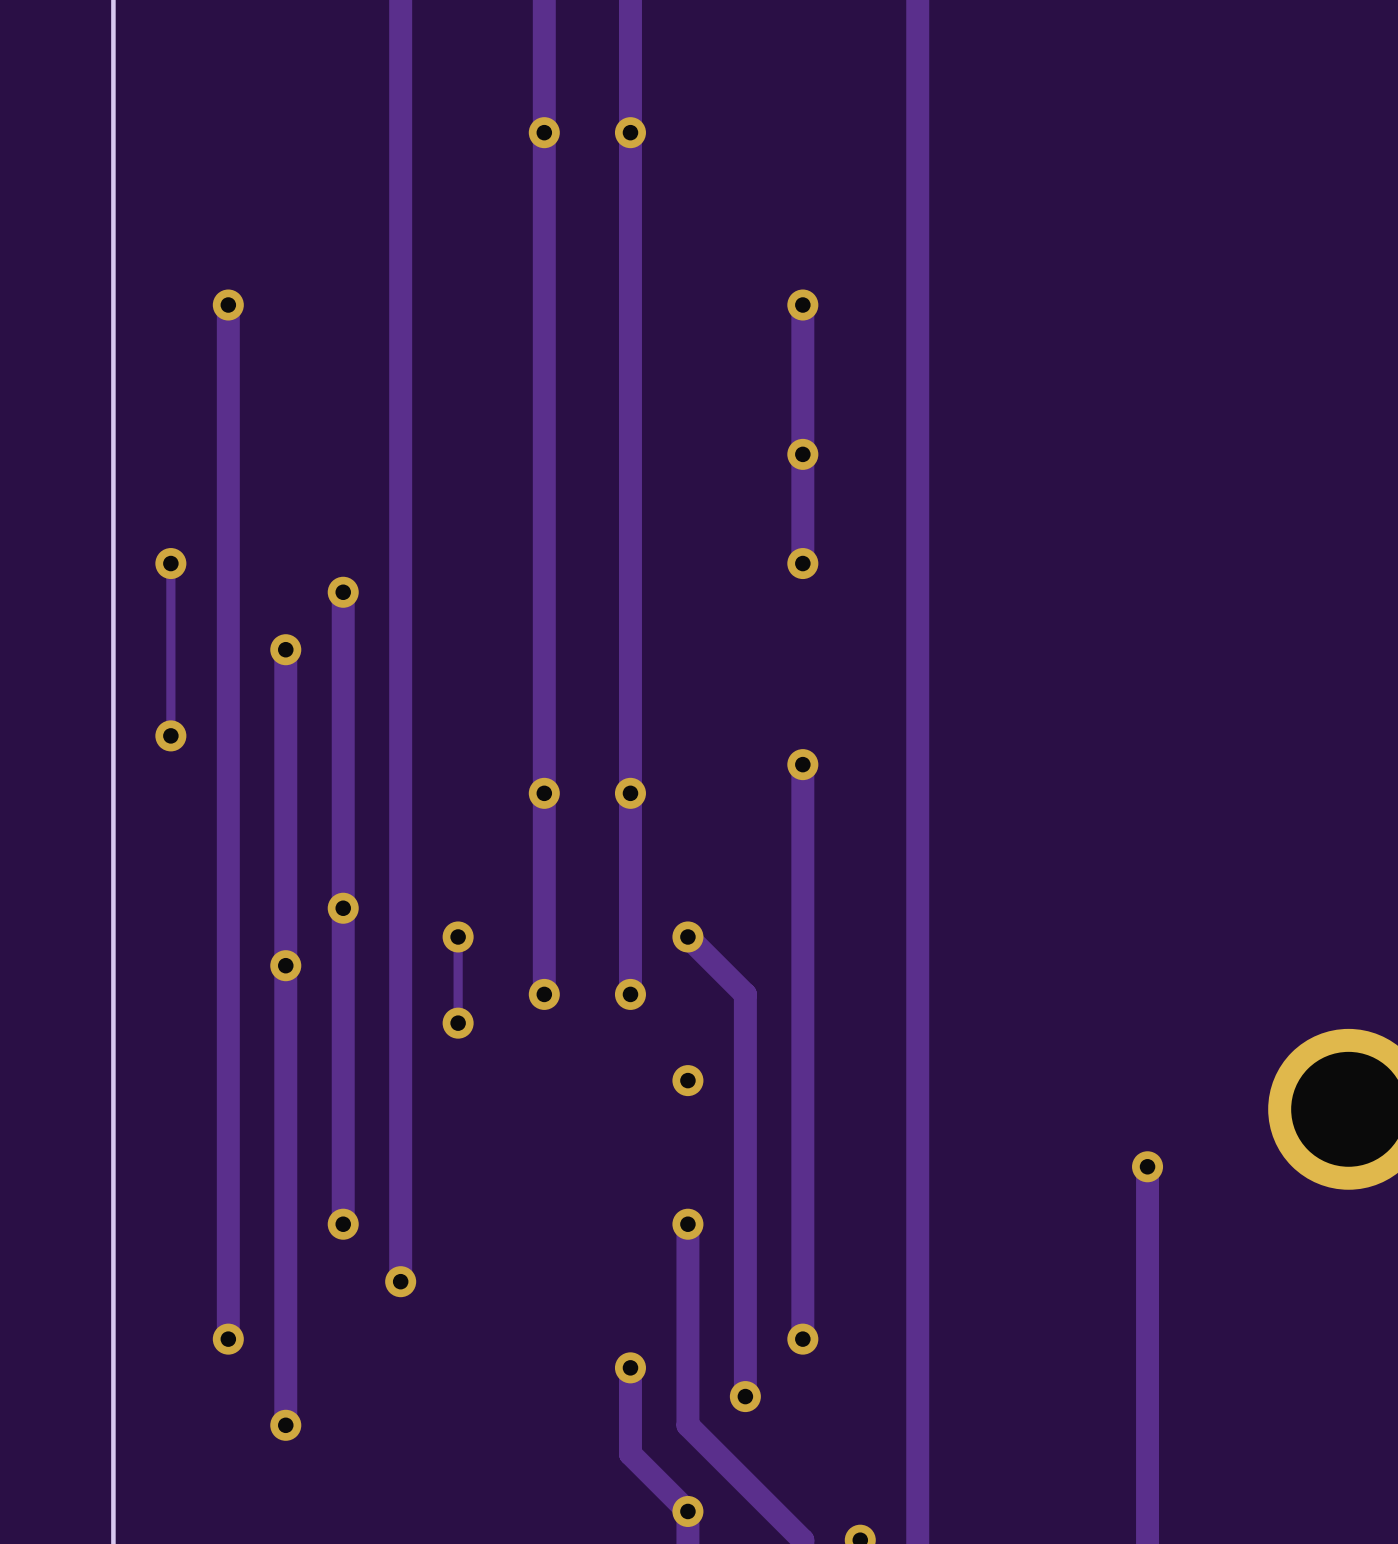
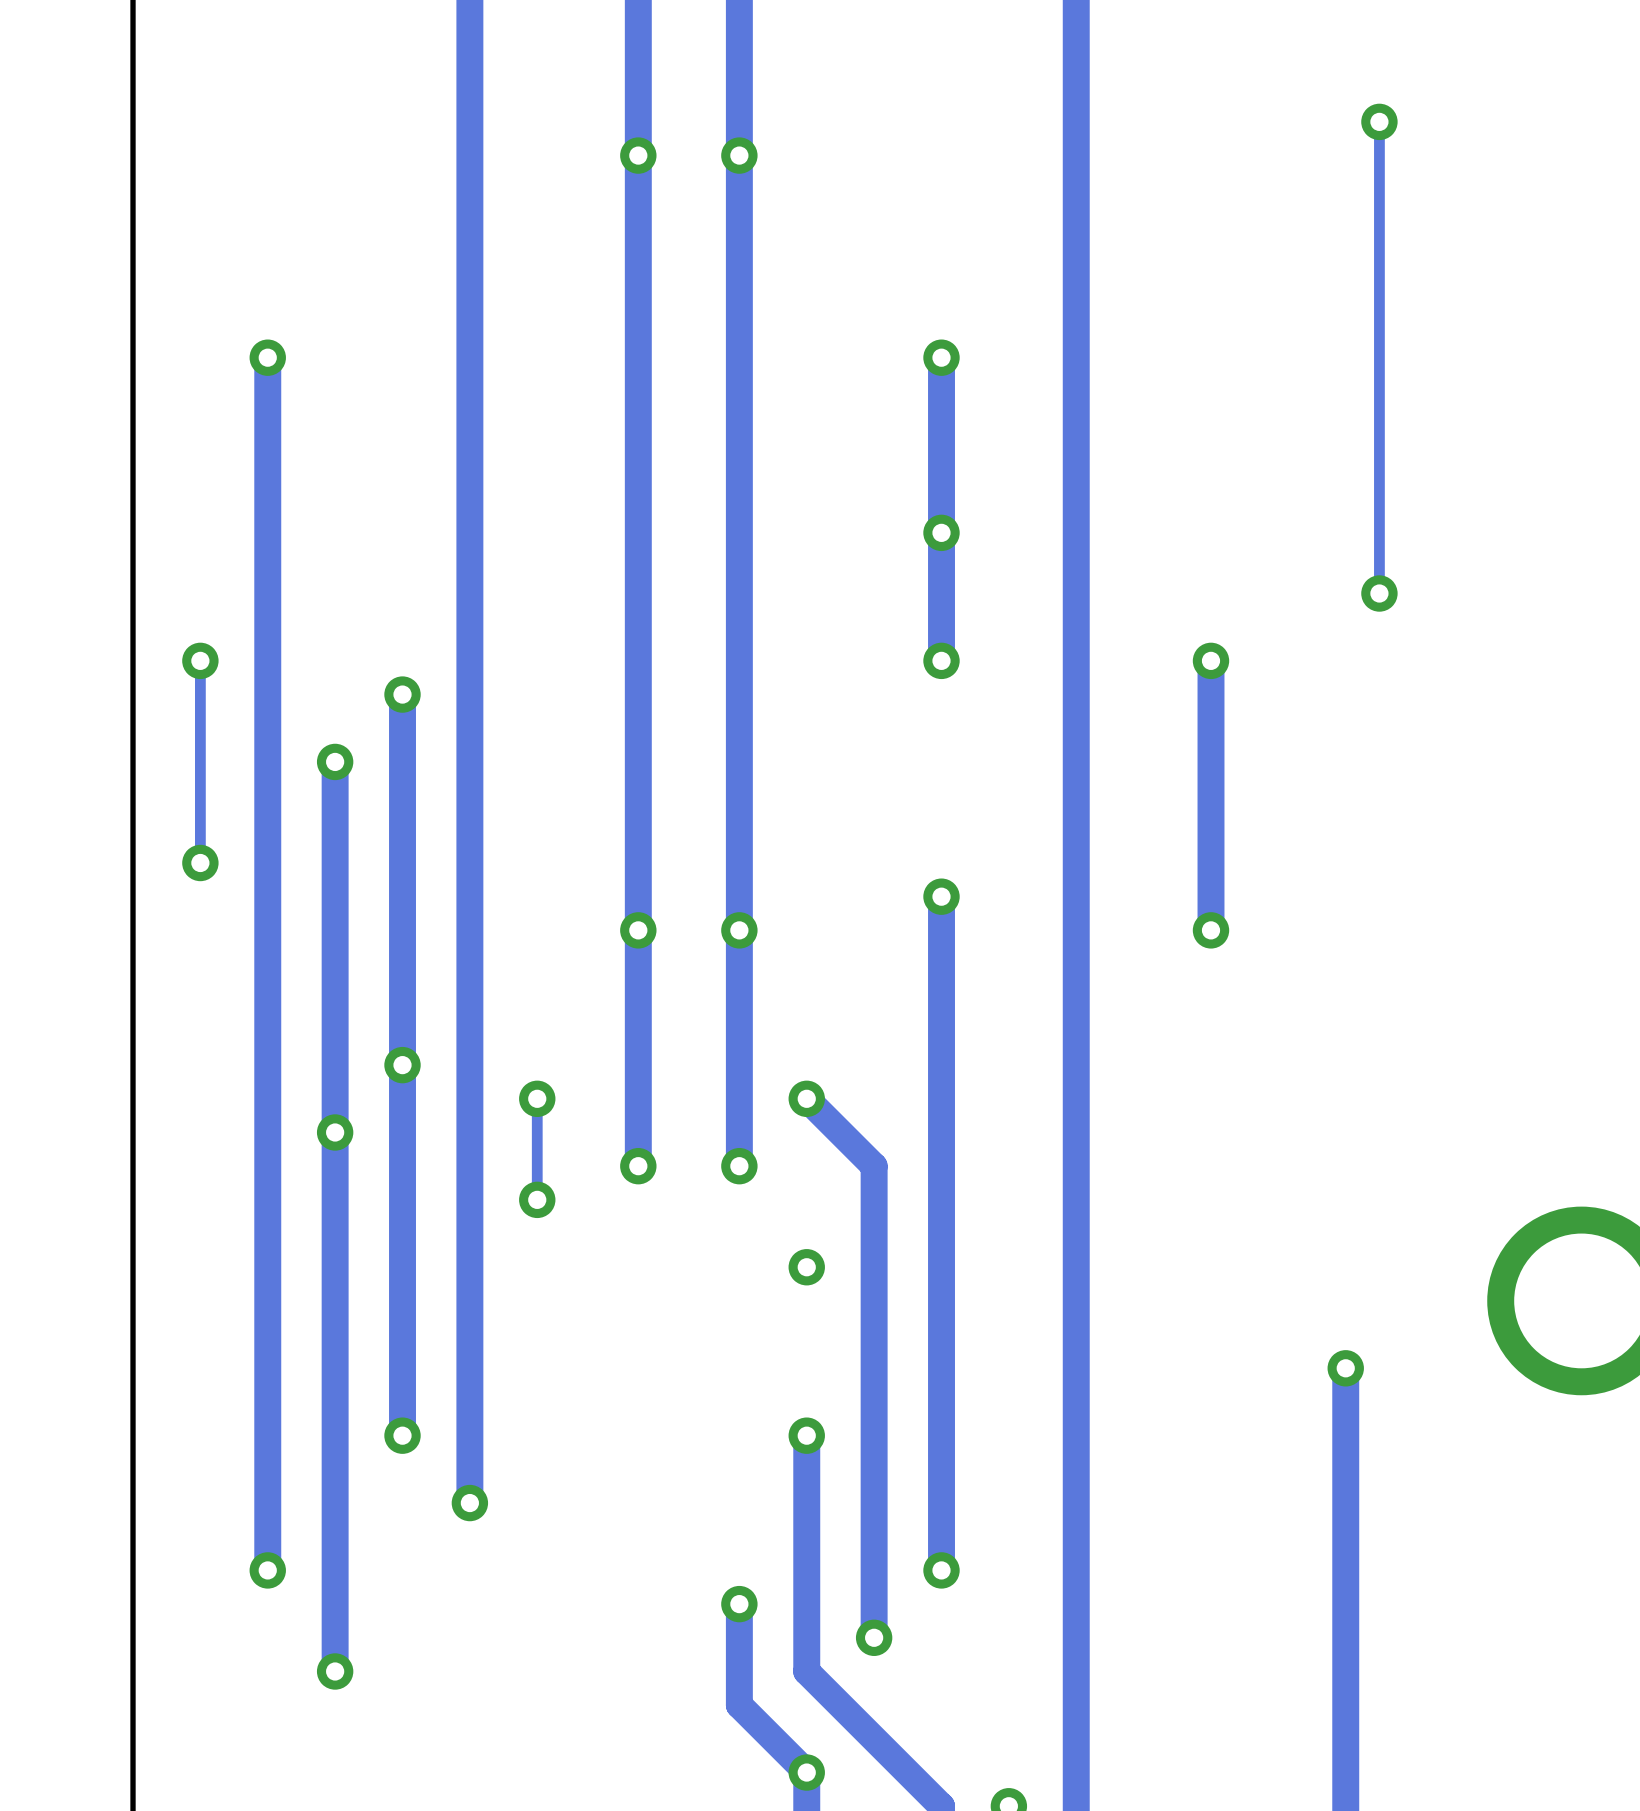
track: none -> (1379, 121) (1379, 593)
via: none -> (1379, 121)
via: none -> (1379, 593)
track: none -> (1211, 660) (1211, 930)
via: none -> (1211, 660)
via: none -> (1211, 930)

